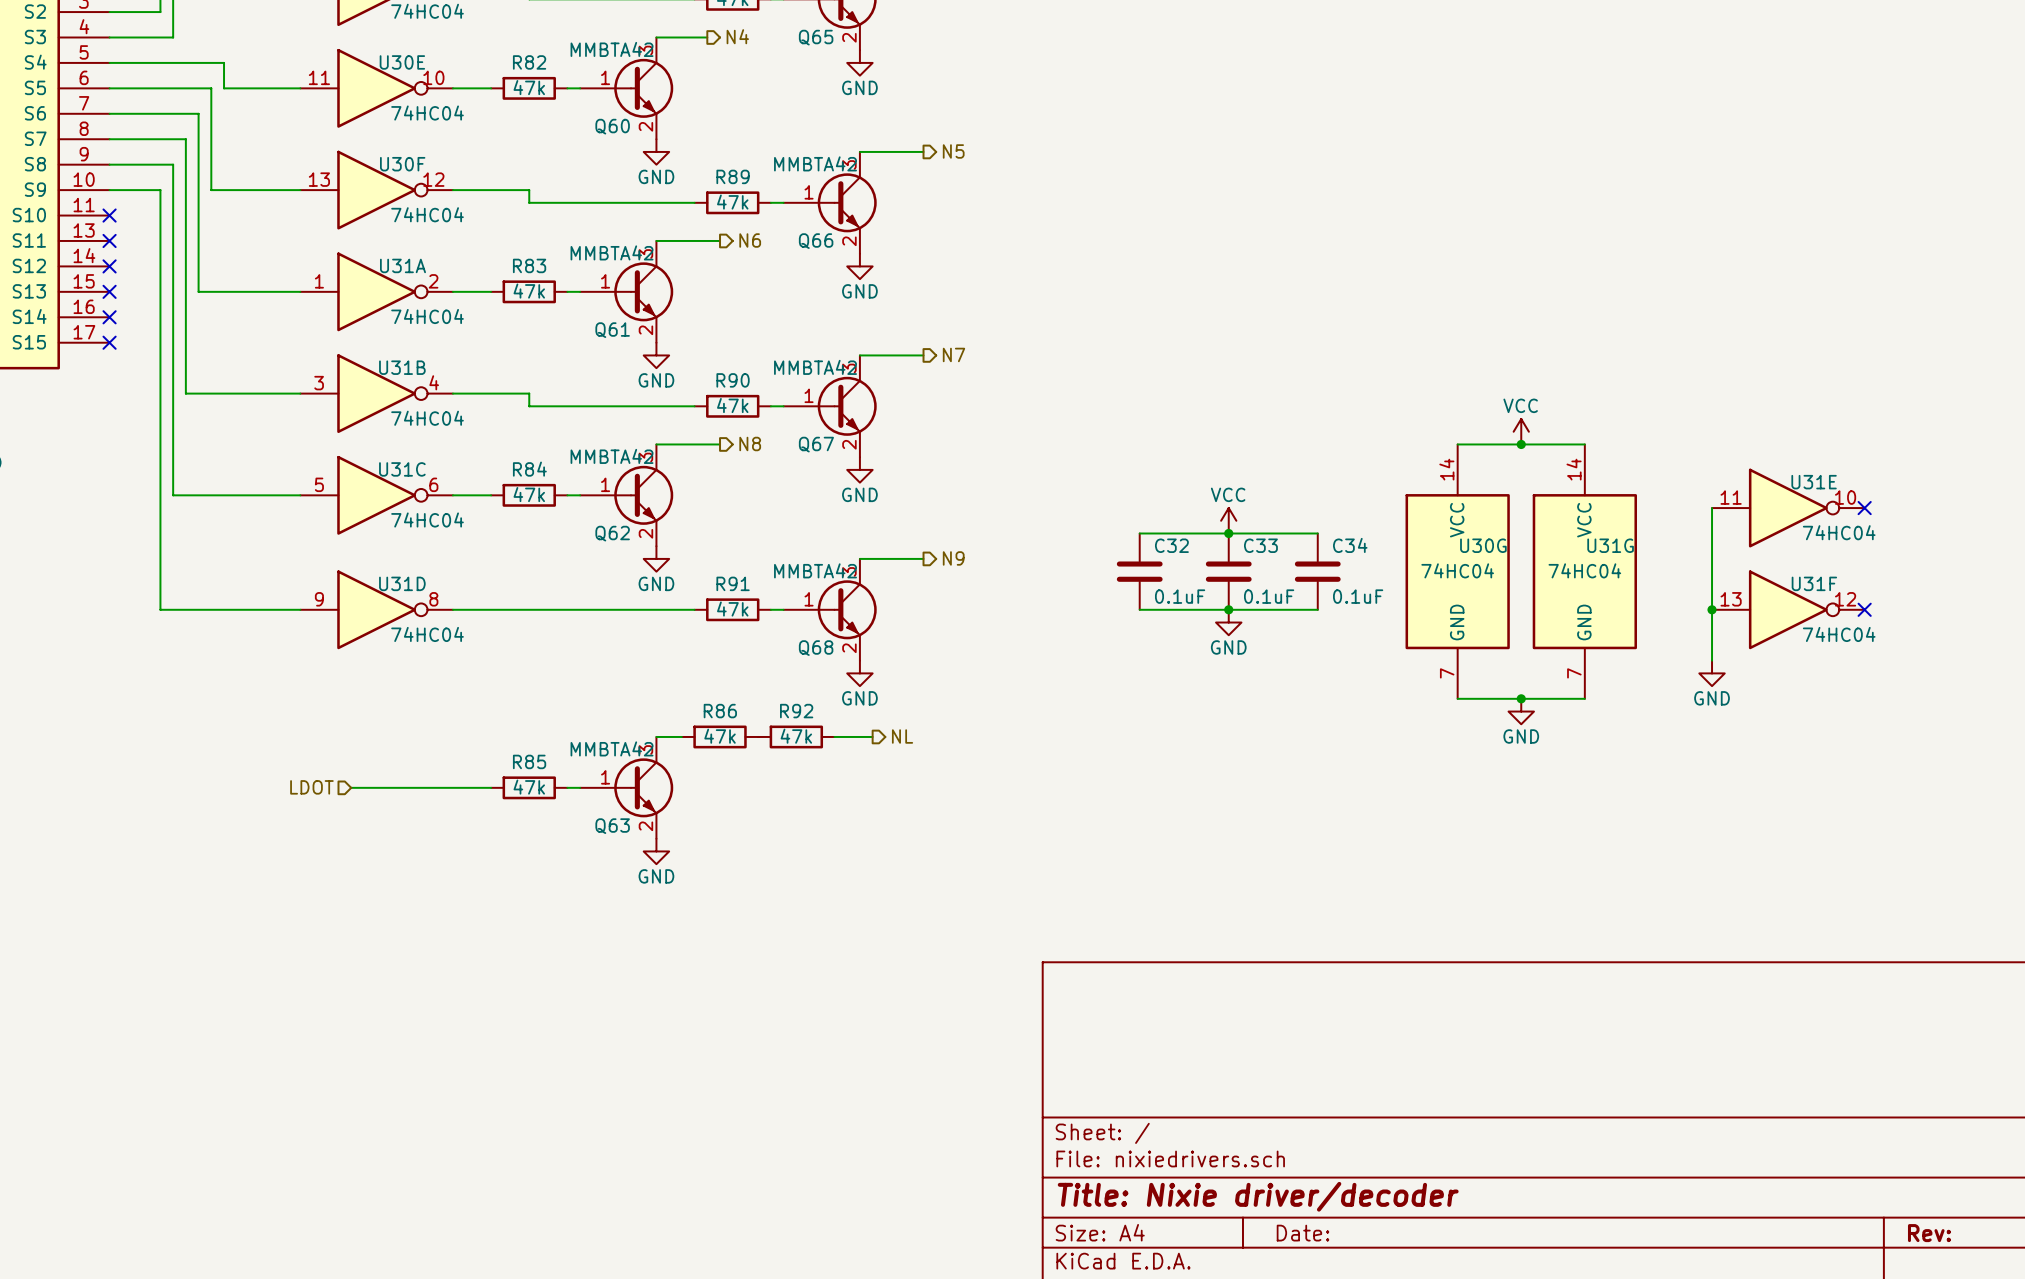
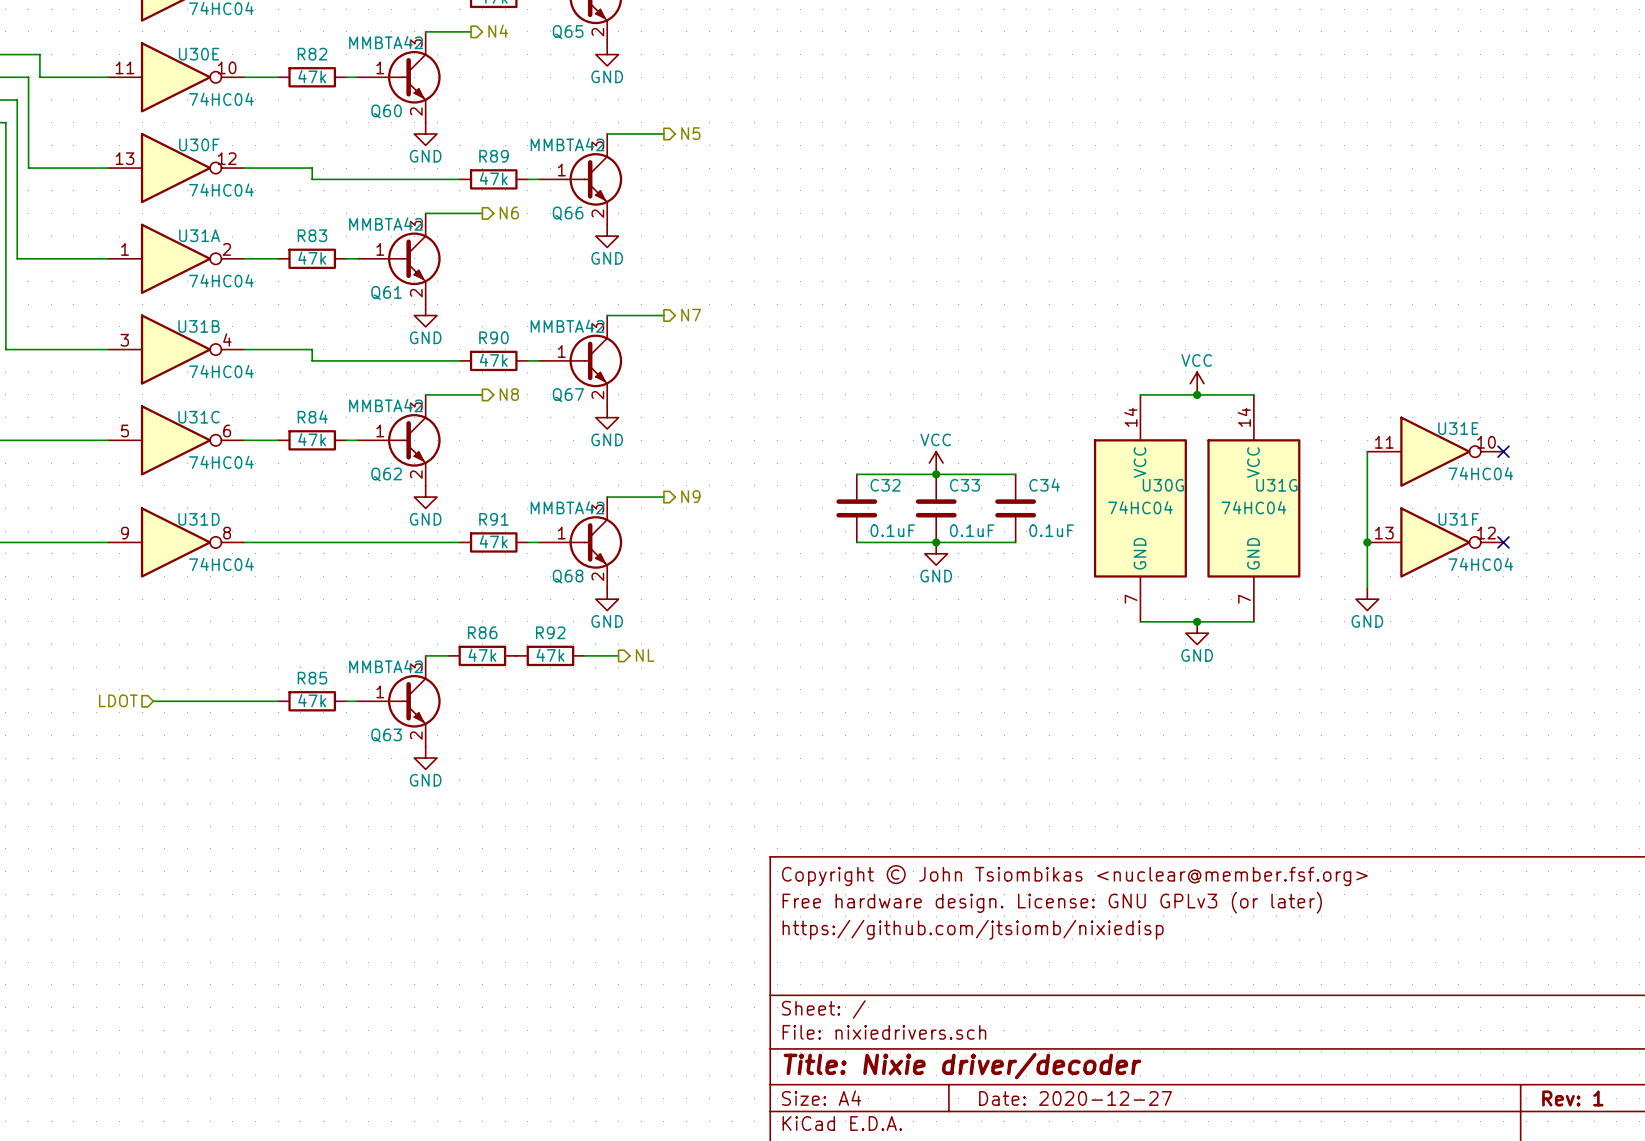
title block: none -> Copyright © John Tsiombikas <nuclear@member.fsf.org> (1074, 875)
title block: none -> Free hardware design. License: GNU GPLv3 (or later) (1052, 902)
title block: none -> https://github.com/jtsiomb/nixiedisp (973, 929)
title block: Date: (1303, 1233) -> Date: 2020-12-27 (1075, 1098)
title block: Rev: (1929, 1233) -> Rev: 1 (1572, 1098)

